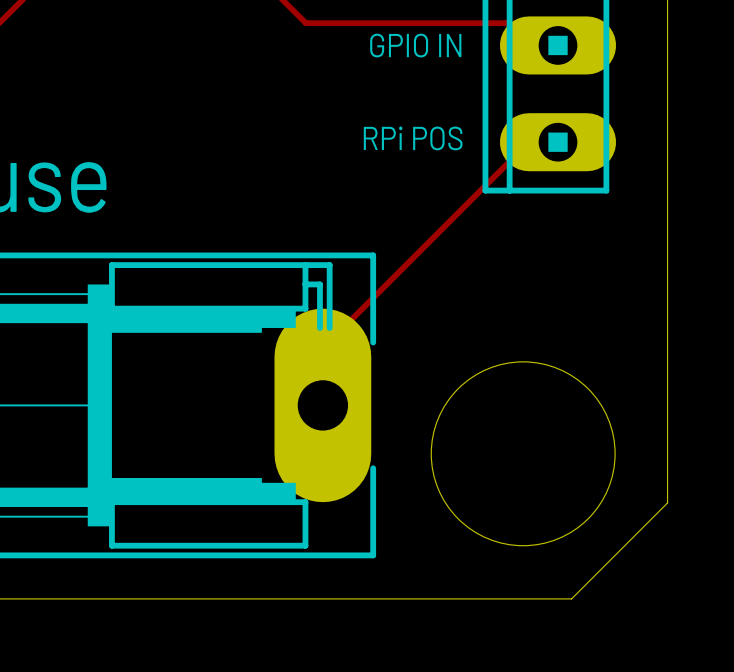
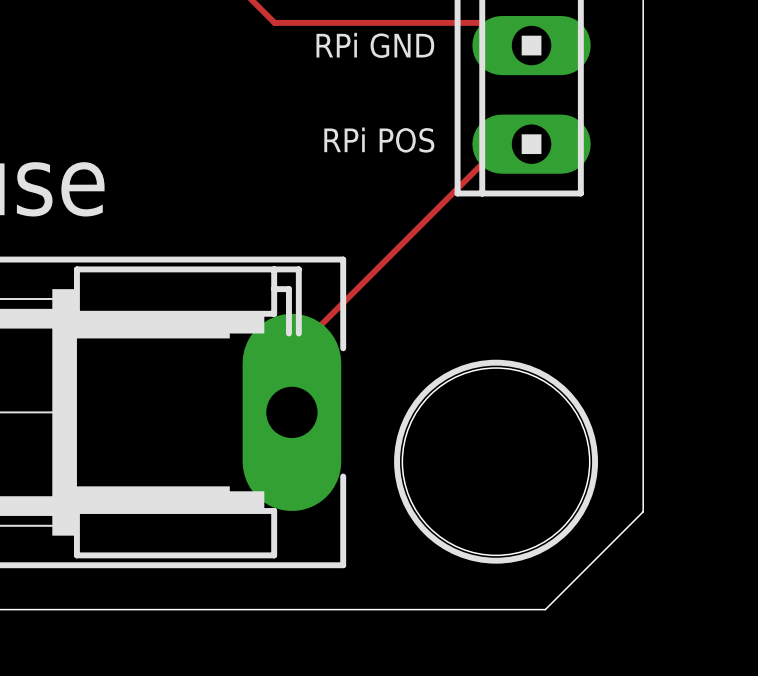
text: GPIO IN (415, 45) -> RPi GND (375, 45)
drawing: none -> [394, 359, 599, 564]

